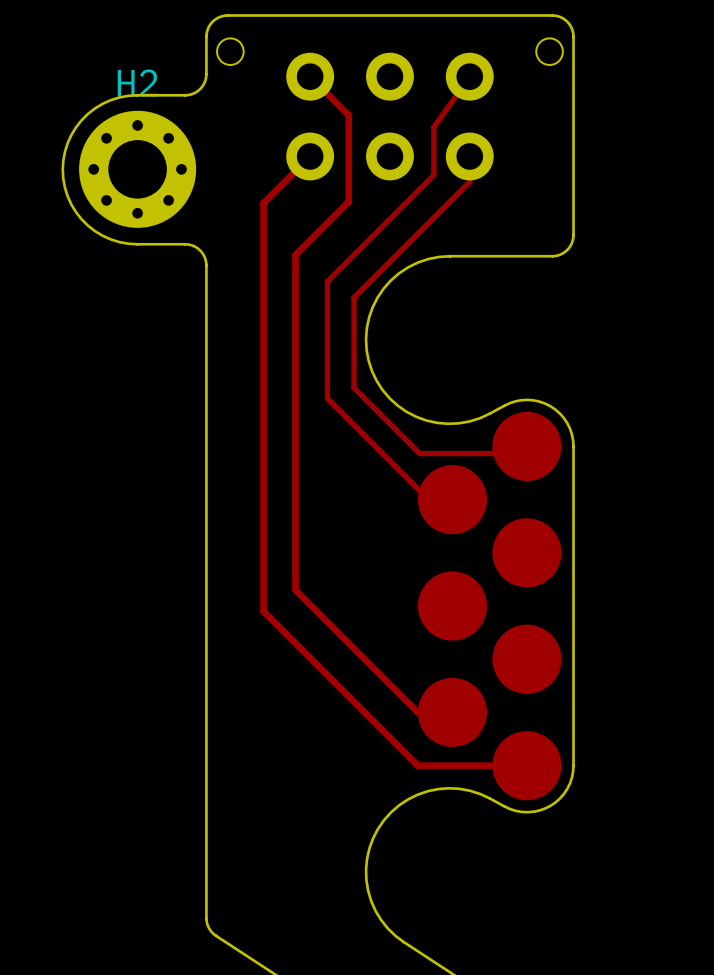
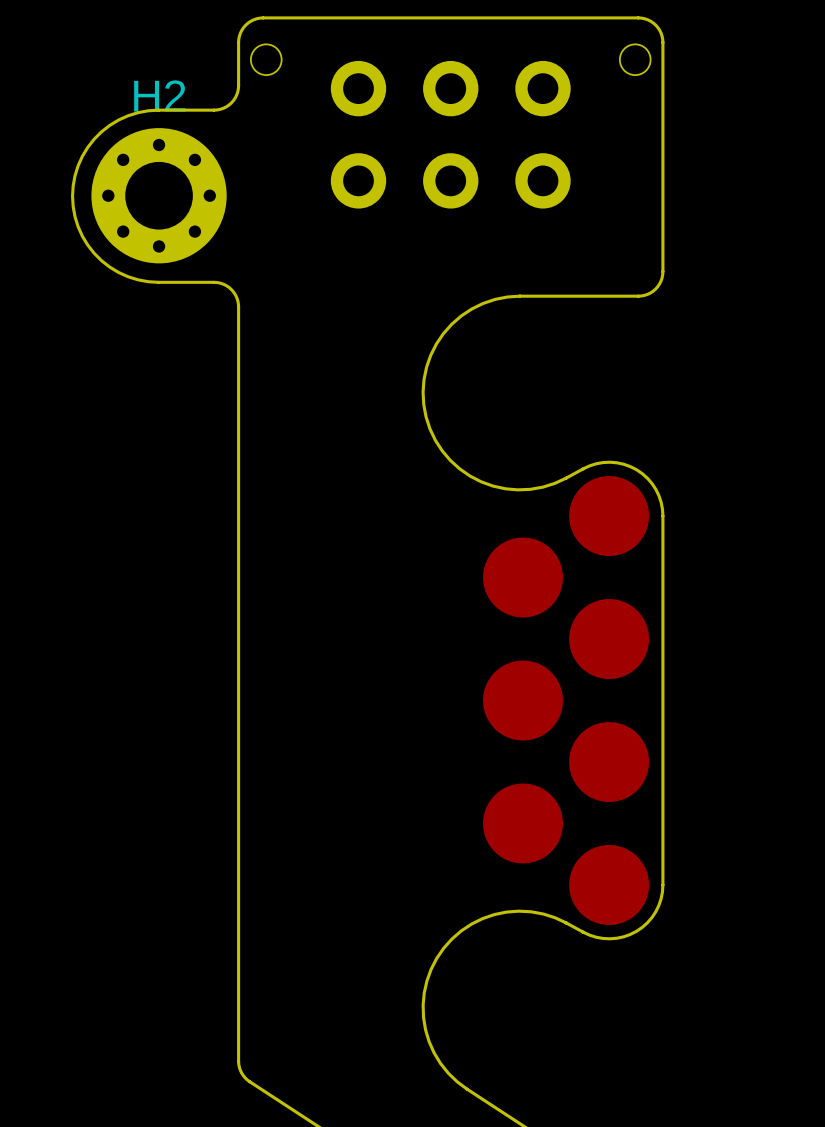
track: (310, 76) (348, 115) (348, 201) (295, 254) (295, 590) (417, 712) (452, 712) -> none
track: (469, 76) (433, 127) (433, 175) (327, 281) (327, 398) (428, 499) (452, 499) -> none
track: (310, 156) (263, 203) (263, 611) (417, 765) (526, 765) -> none
track: (469, 156) (469, 181) (354, 297) (354, 387) (419, 453) (503, 453) -> none

